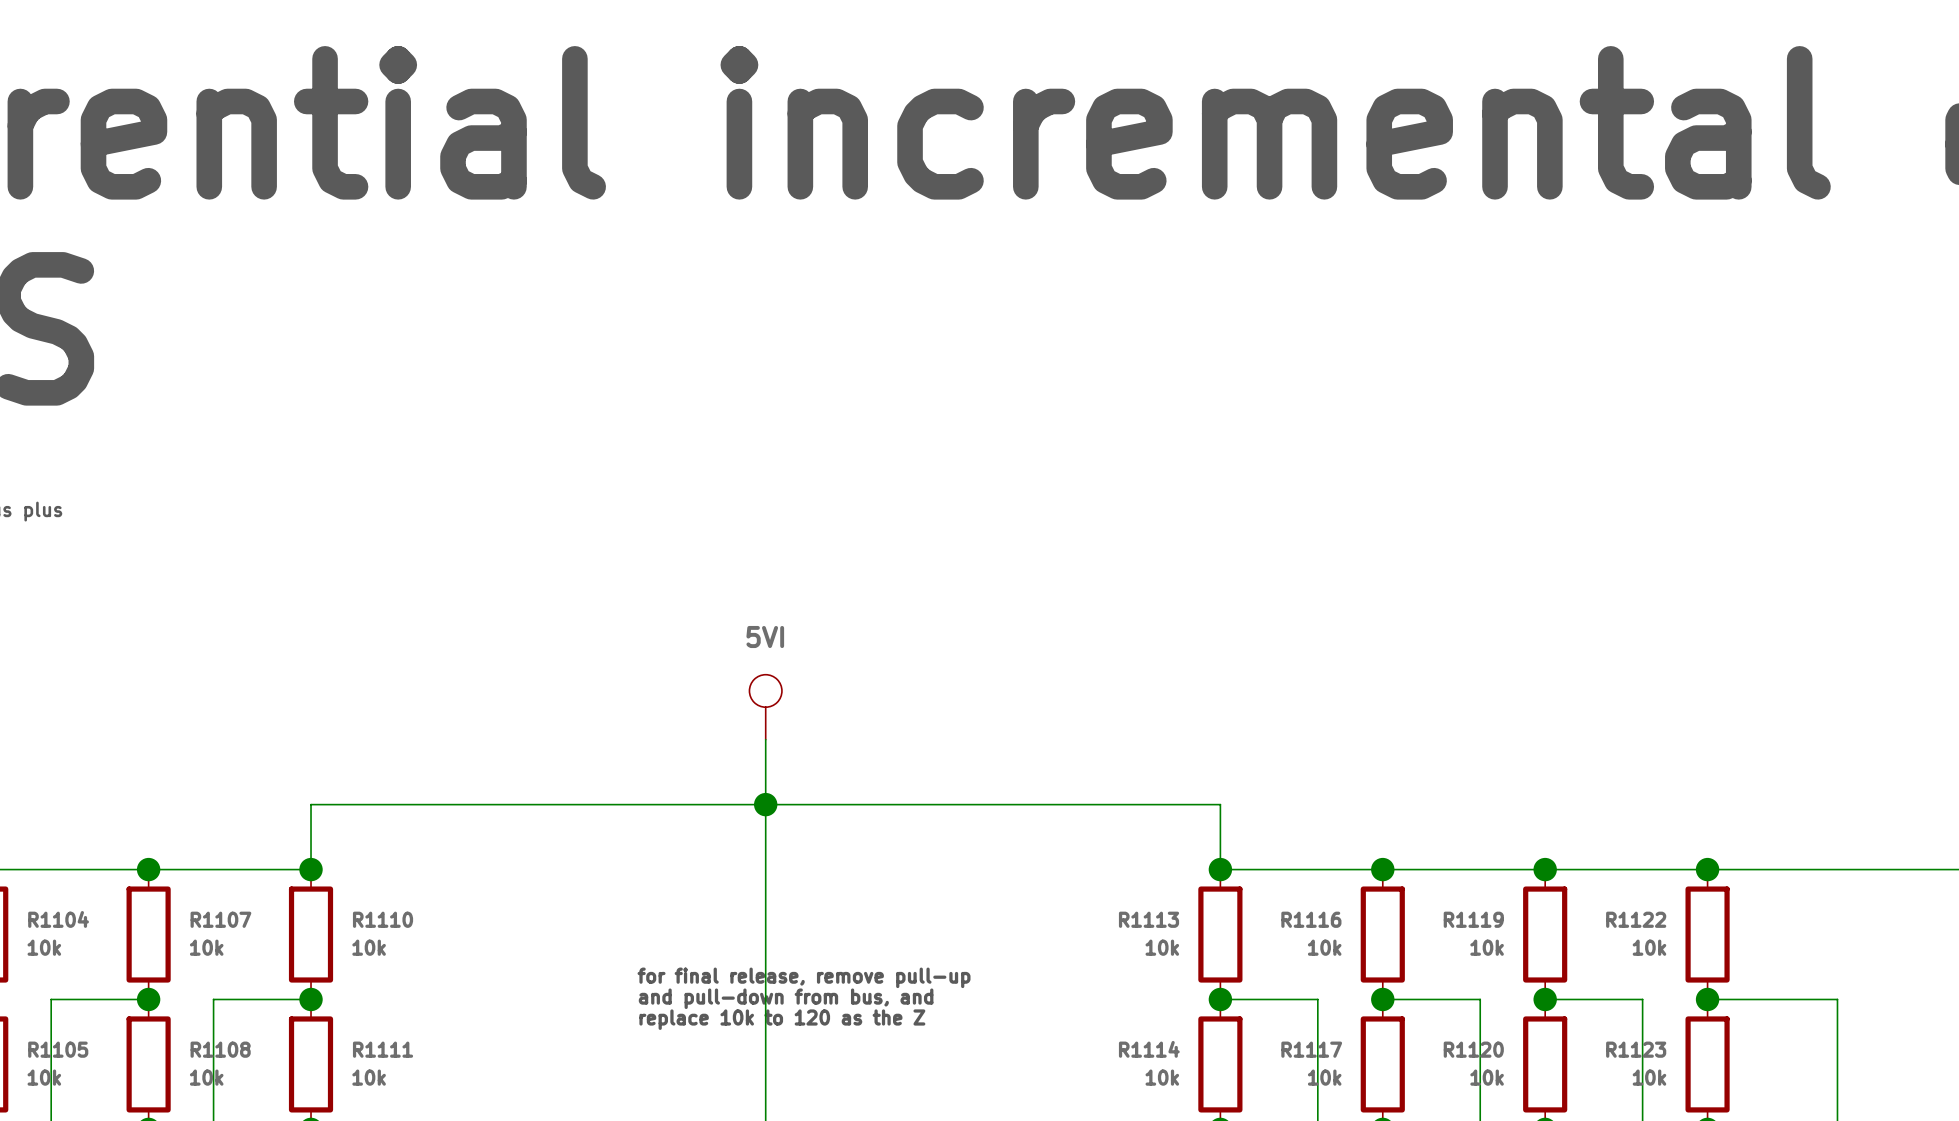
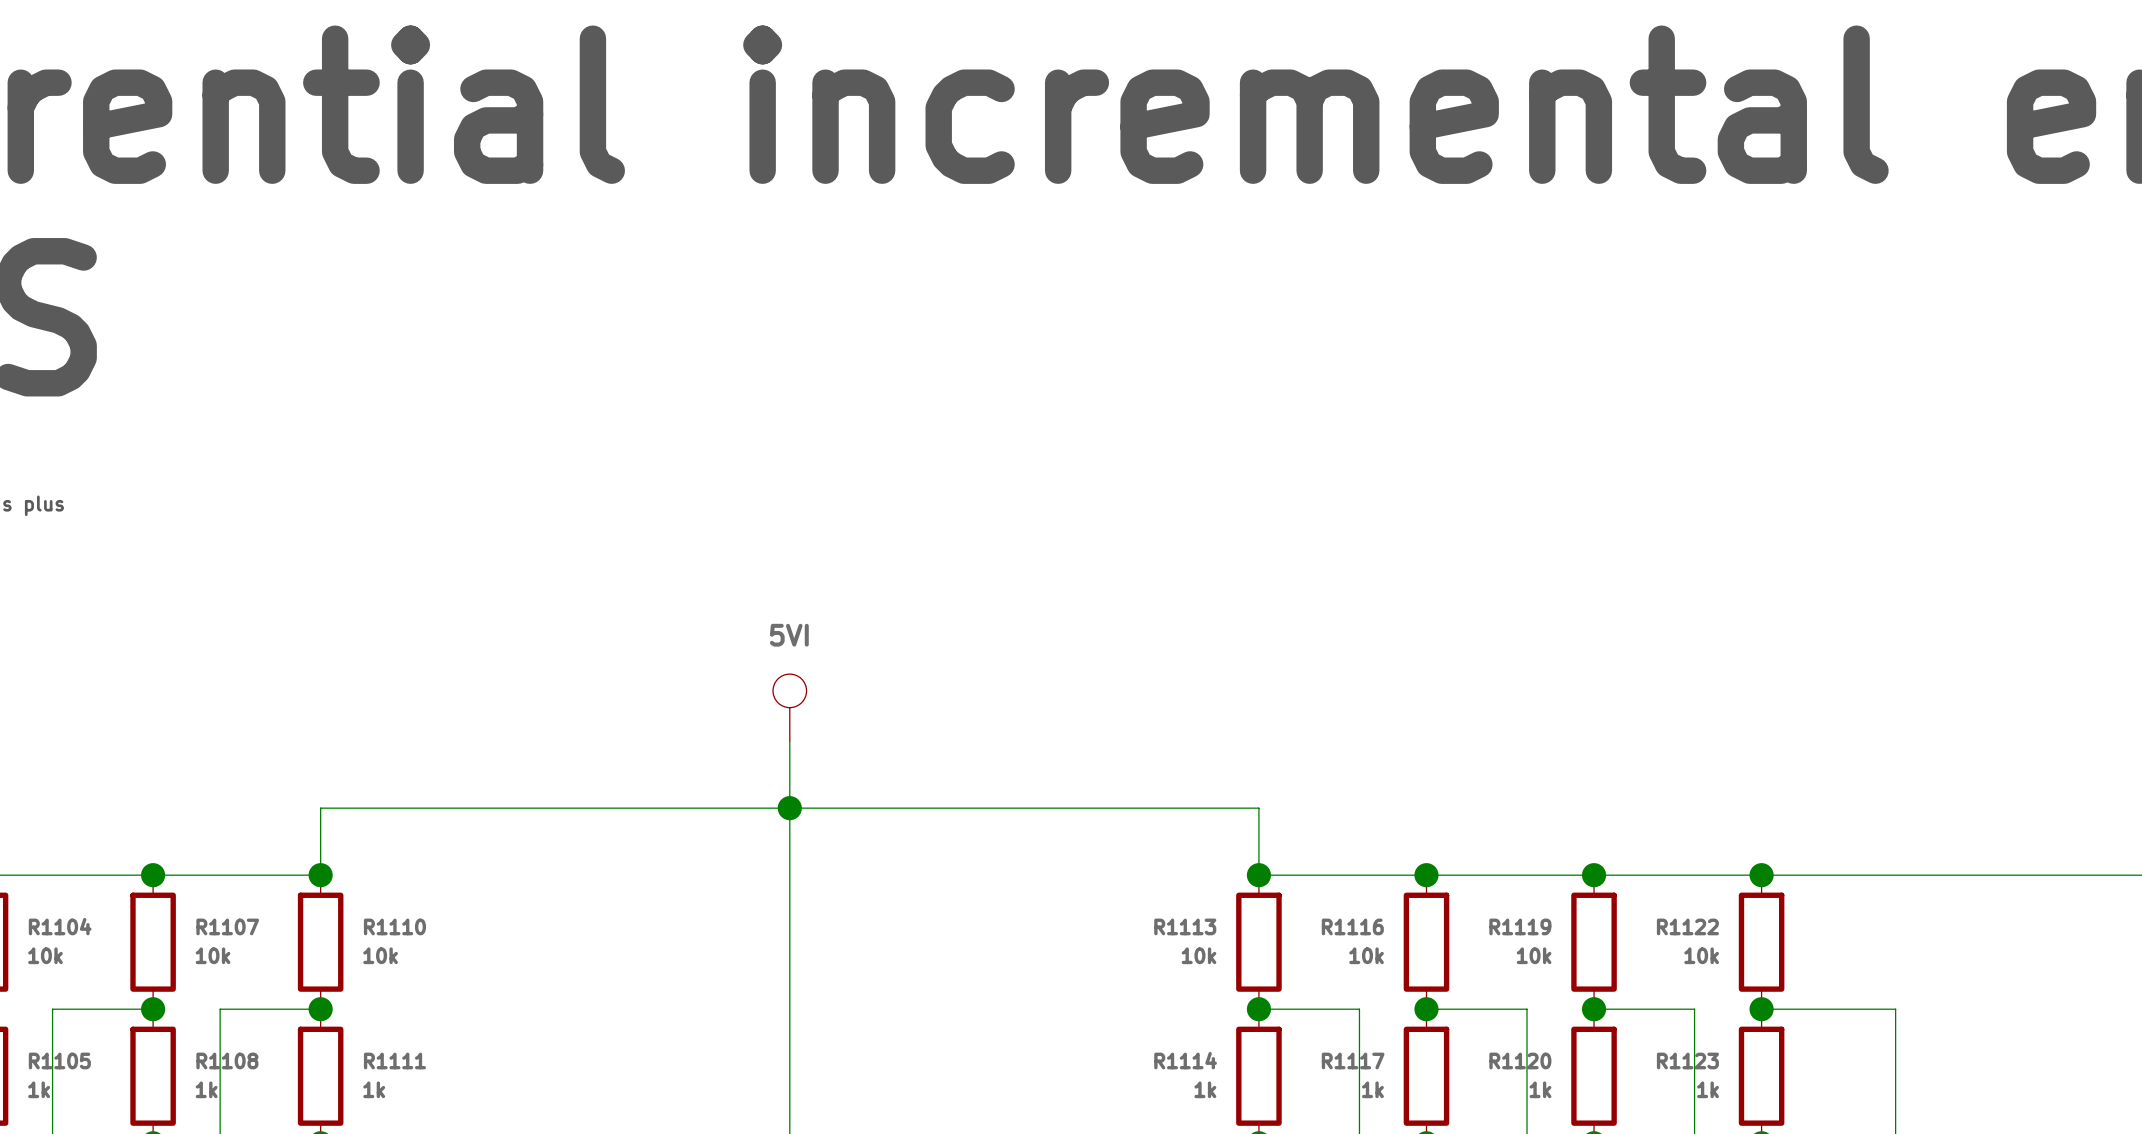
text: for final release, remove pull-up (804, 977) -> none
text: and pull-down from bus, and (786, 998) -> none
text: replace 10k to 120 as the Z (782, 1019) -> none
R1105 value: 10k (44, 1077) -> 1k (39, 1089)
R1108 value: 10k (206, 1077) -> 1k (206, 1089)
R1111 value: 10k (369, 1077) -> 1k (374, 1089)
R1114 value: 10k (1162, 1077) -> 1k (1205, 1089)
R1117 value: 10k (1324, 1077) -> 1k (1372, 1089)
R1120 value: 10k (1487, 1077) -> 1k (1540, 1089)
R1123 value: 10k (1649, 1077) -> 1k (1708, 1089)

